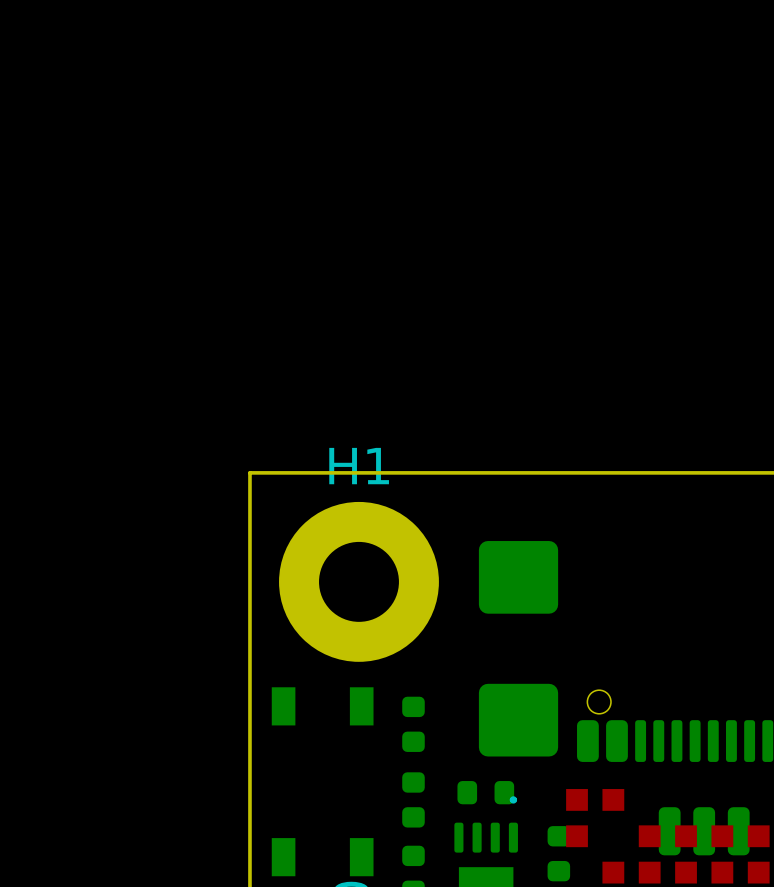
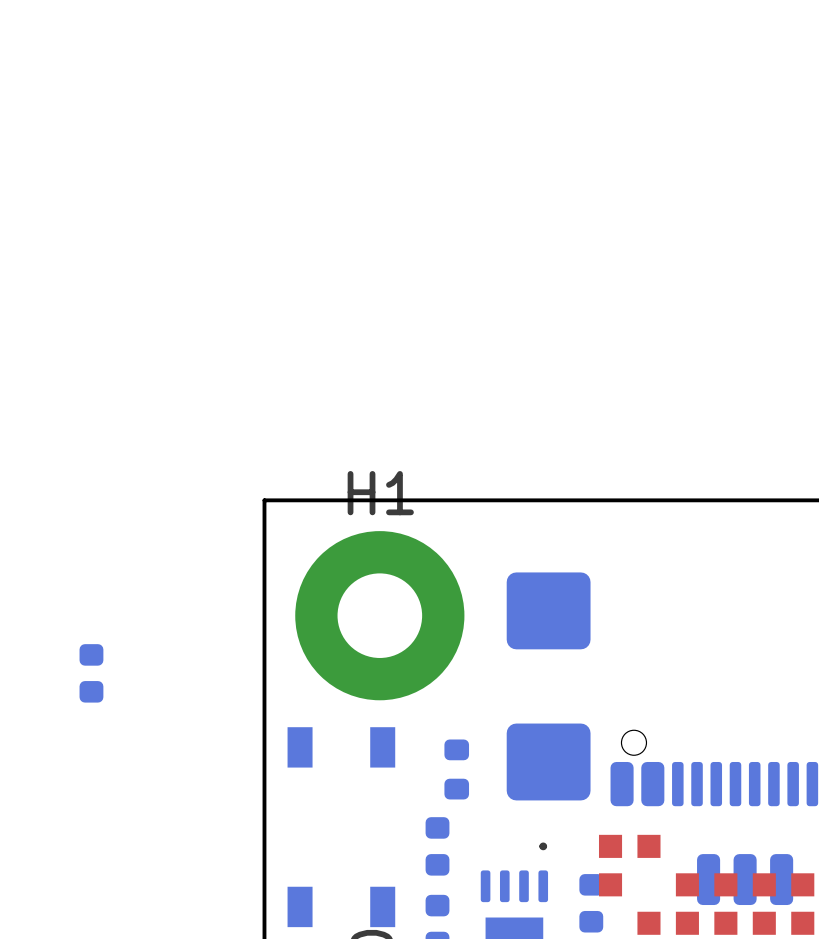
part: none -> (91, 673)
part footprint: [402, 696, 425, 752] -> [444, 739, 470, 800]
part: (485, 792) -> none

